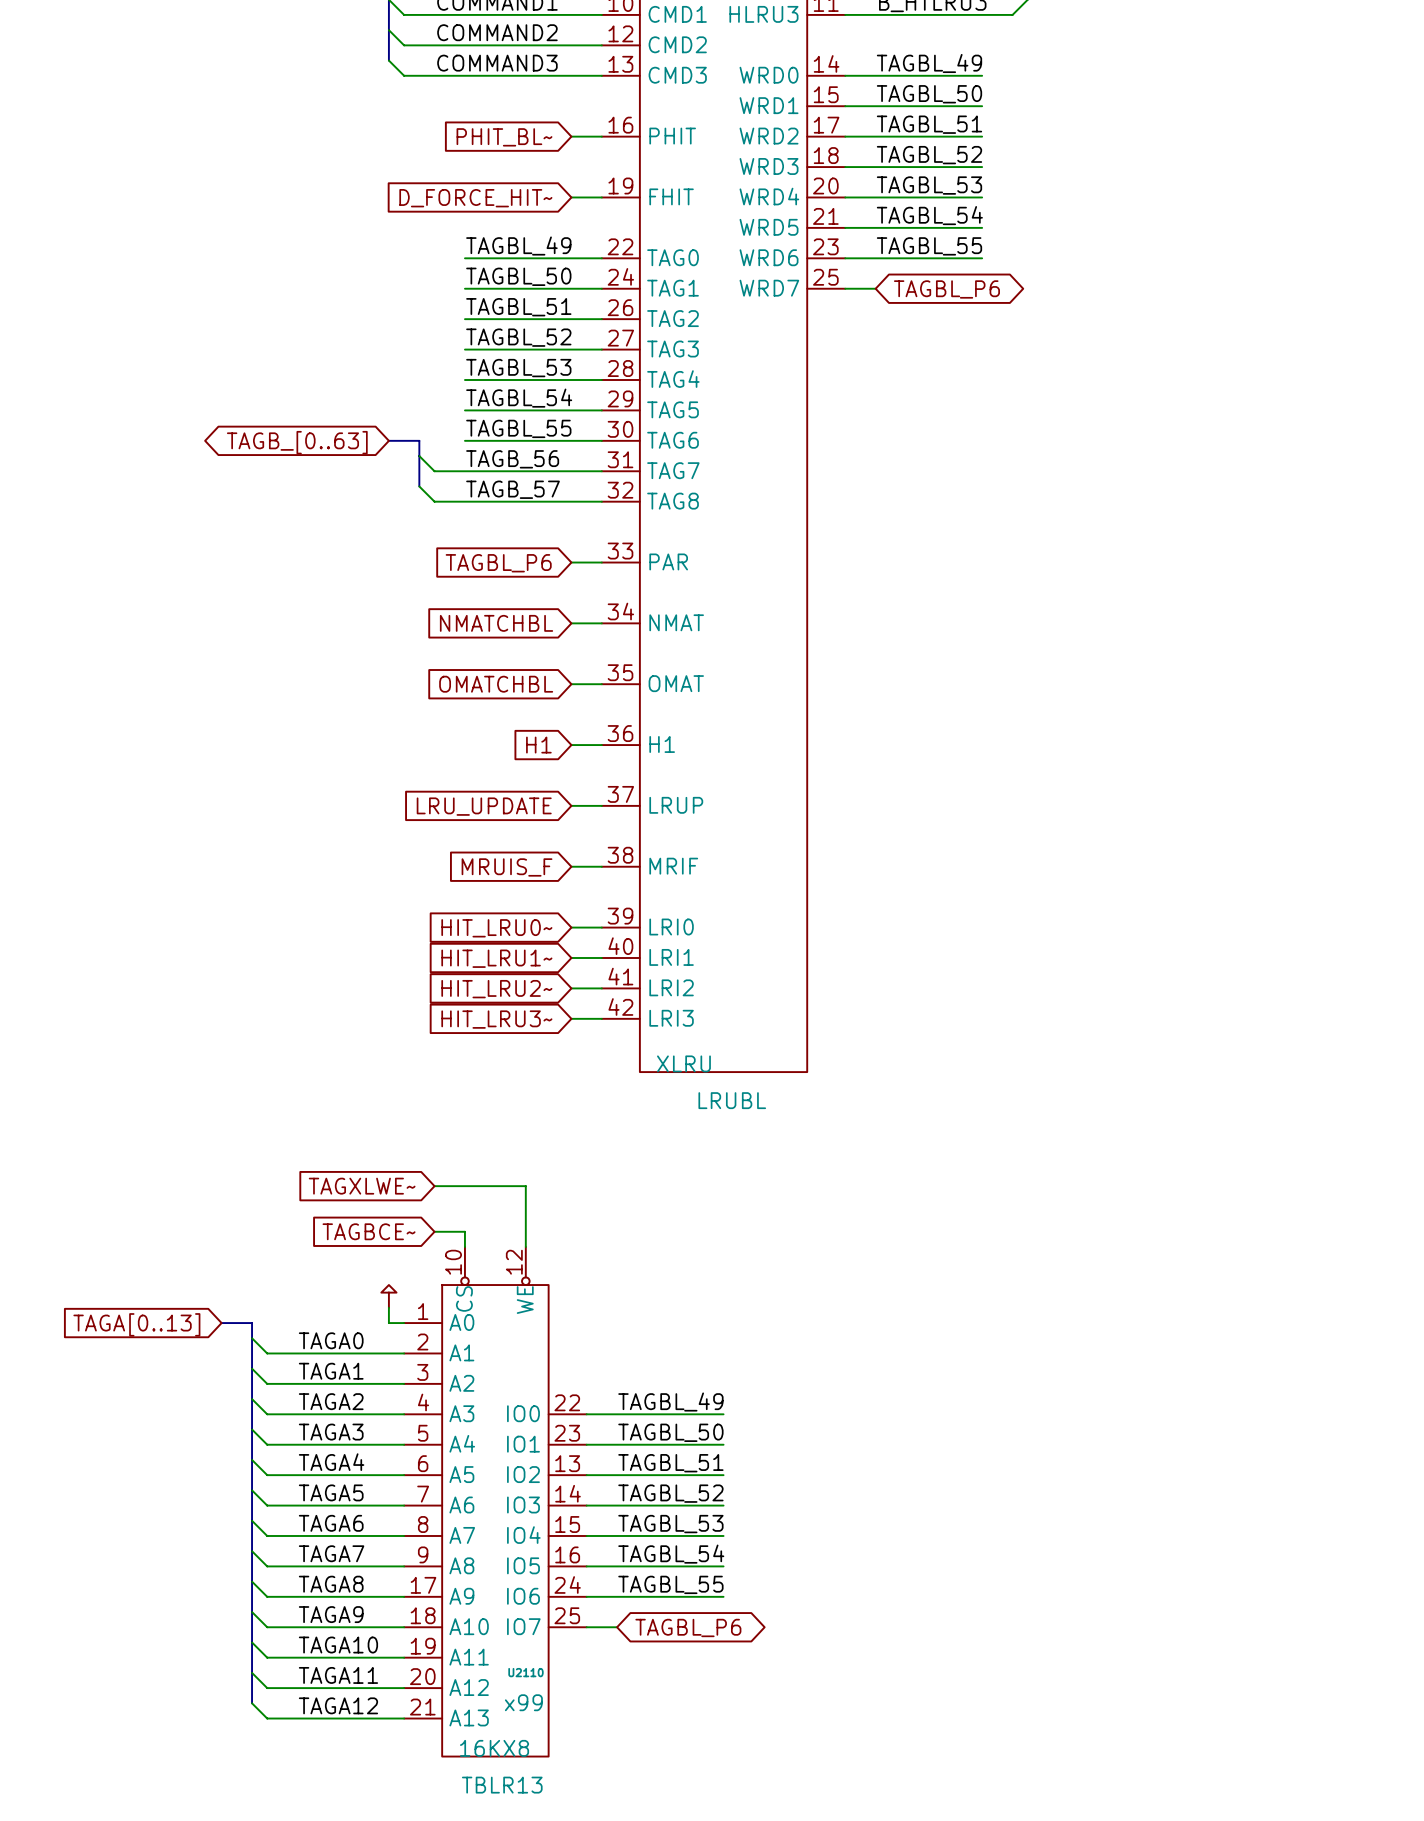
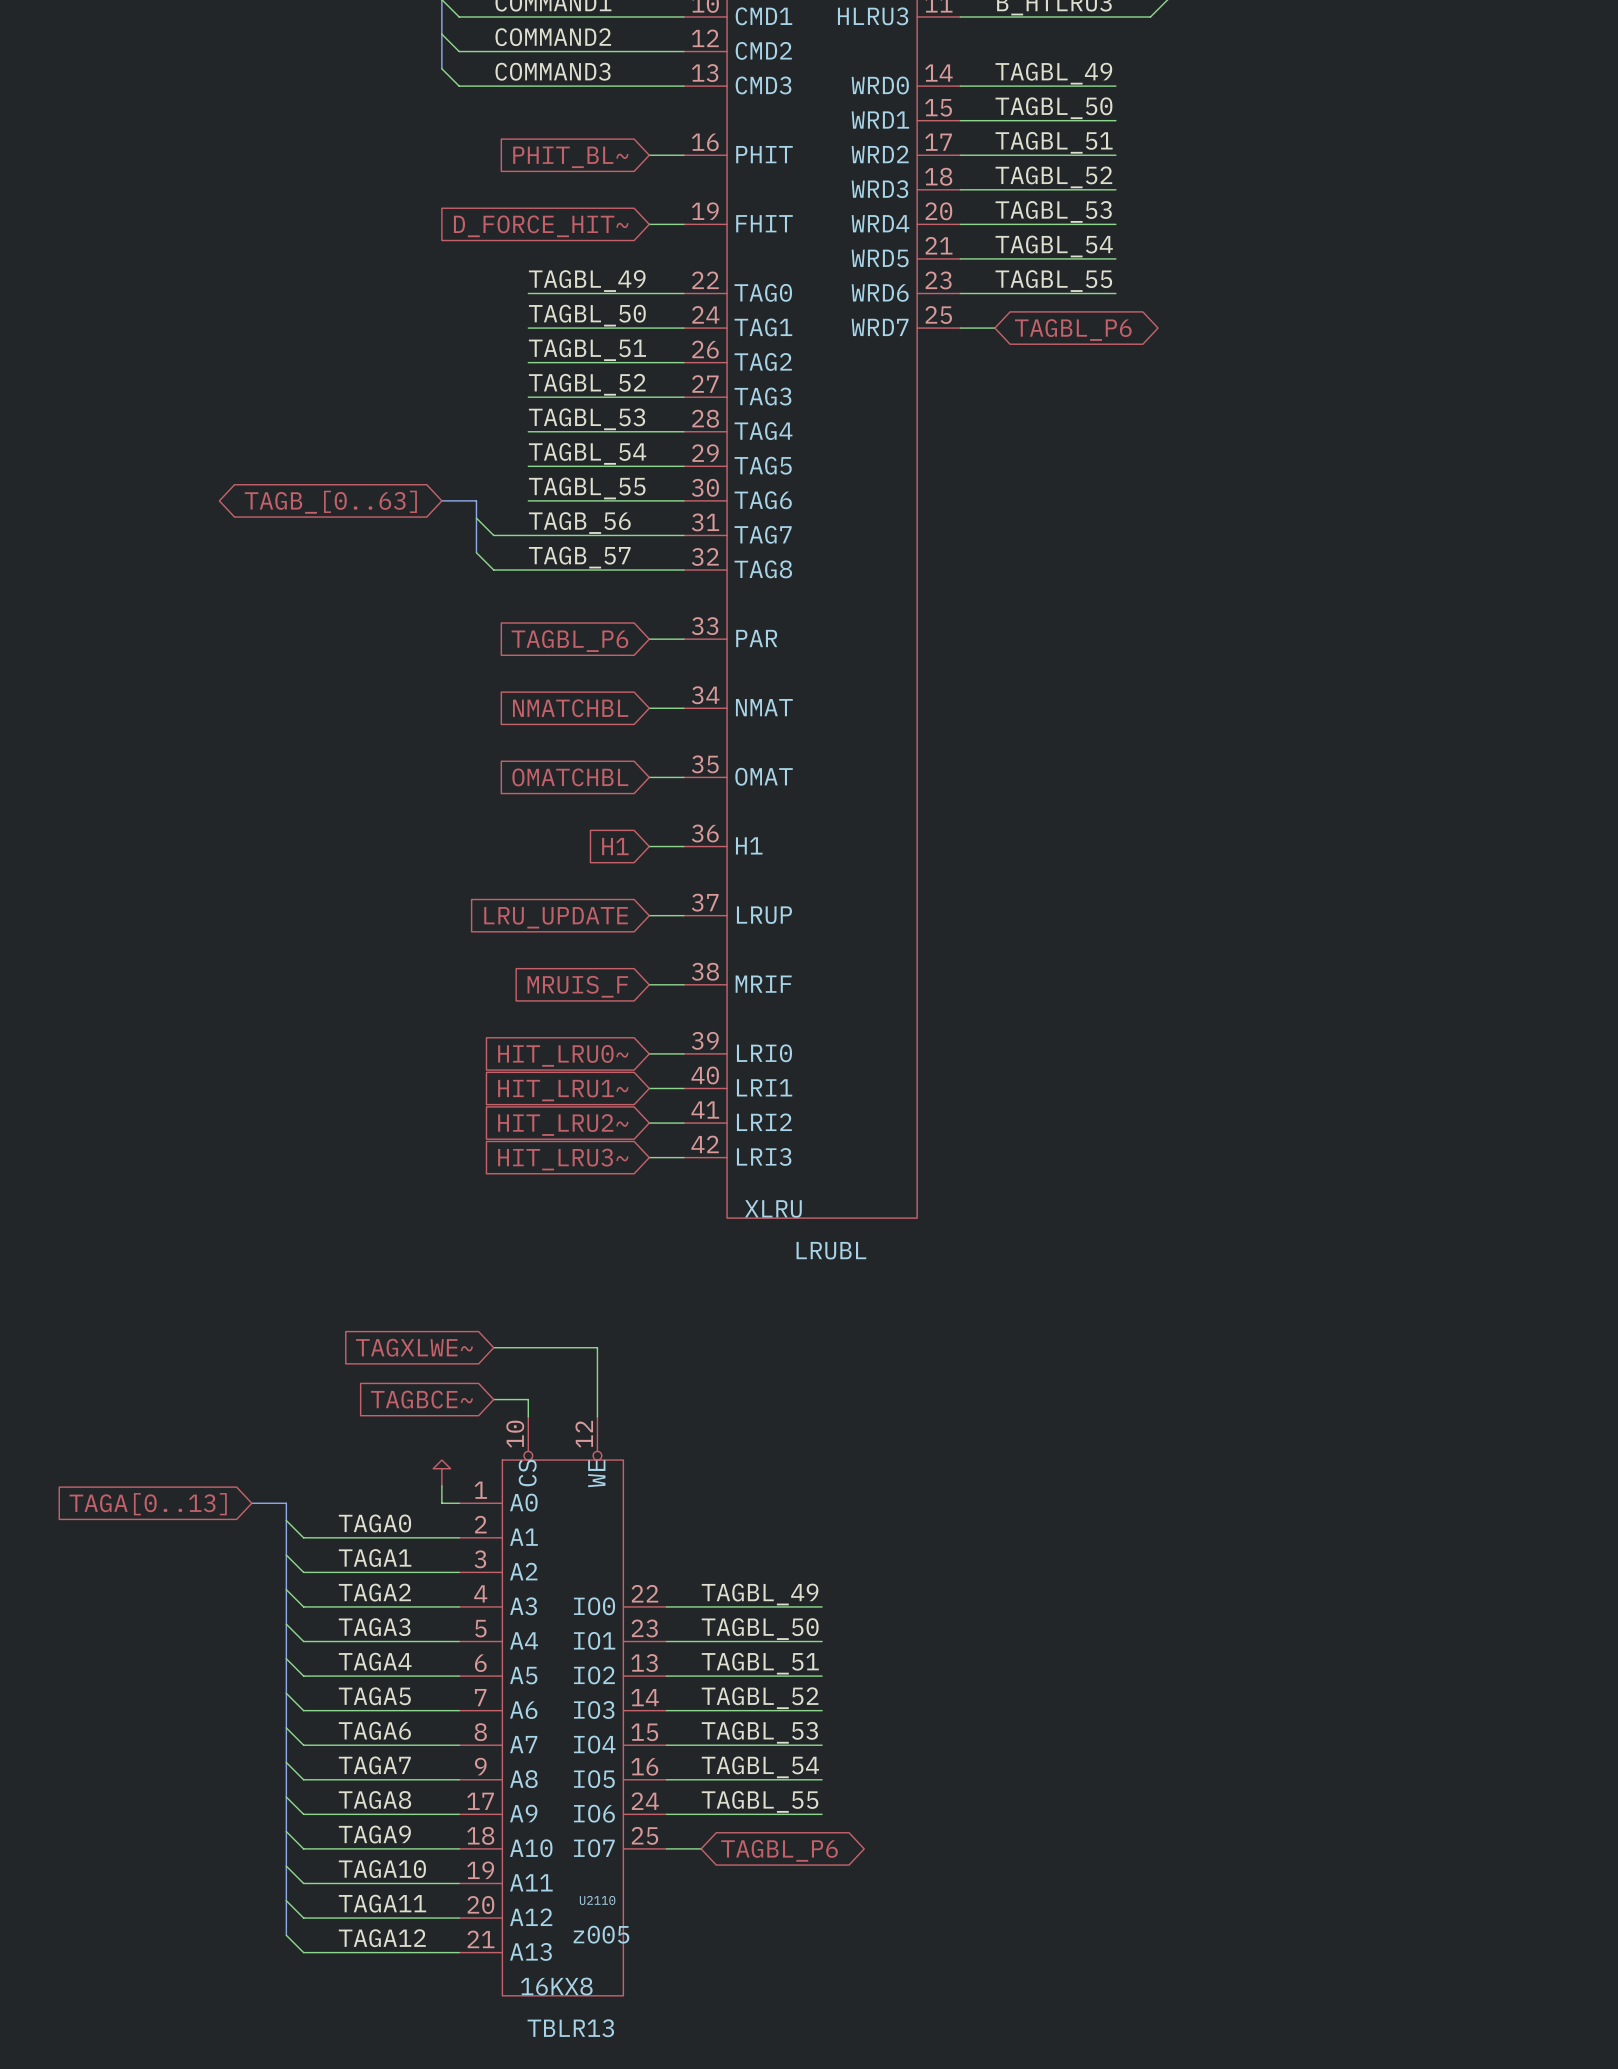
U2110 text: x99 (523, 1702) -> z005 (601, 1934)

